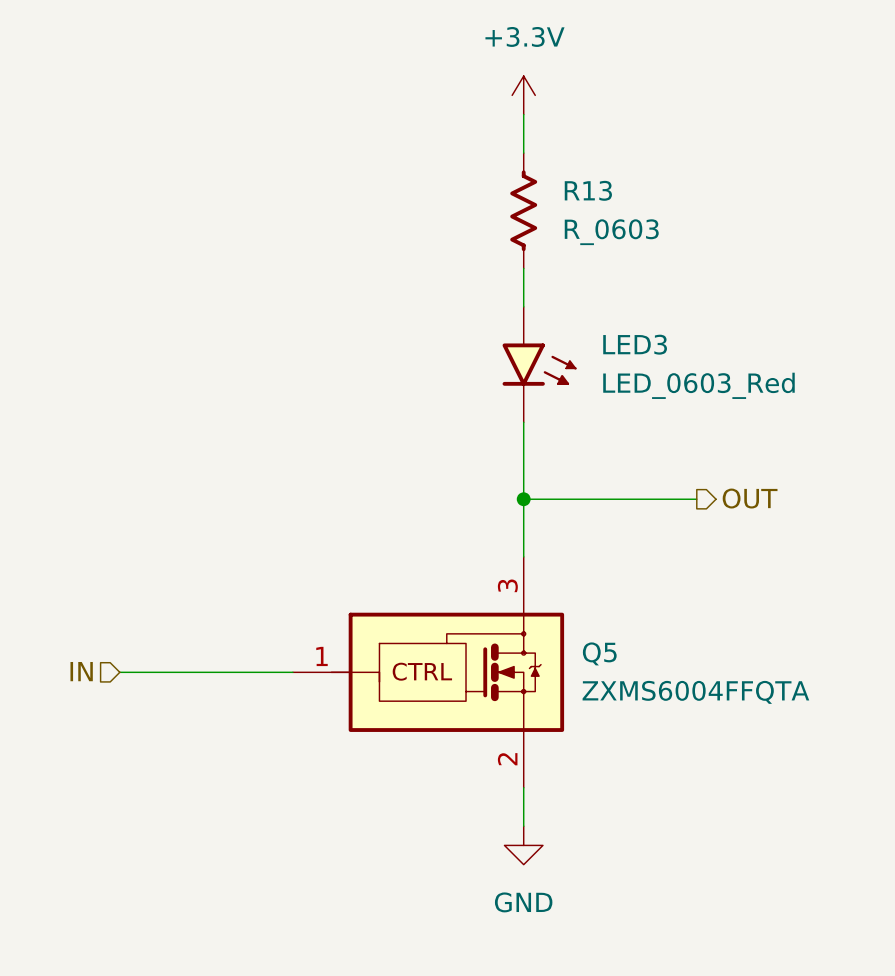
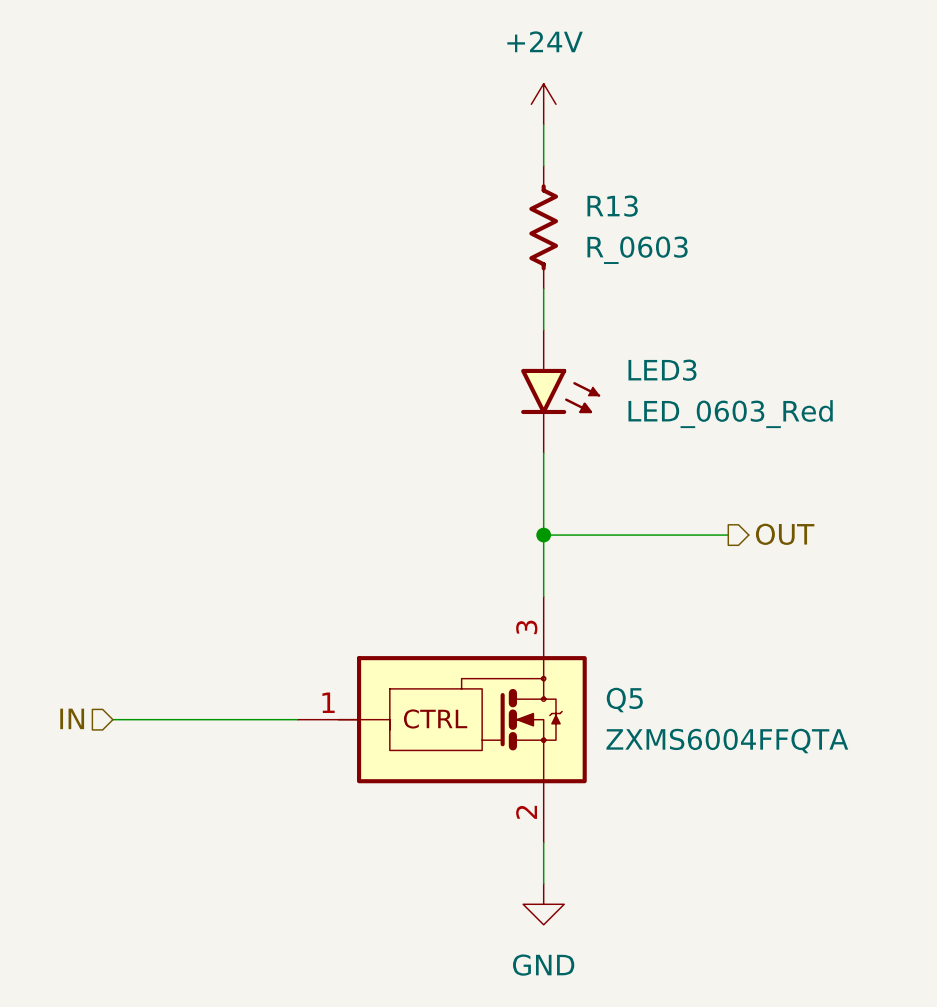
power symbol: +3.3V (523, 95) -> +24V (543, 104)

